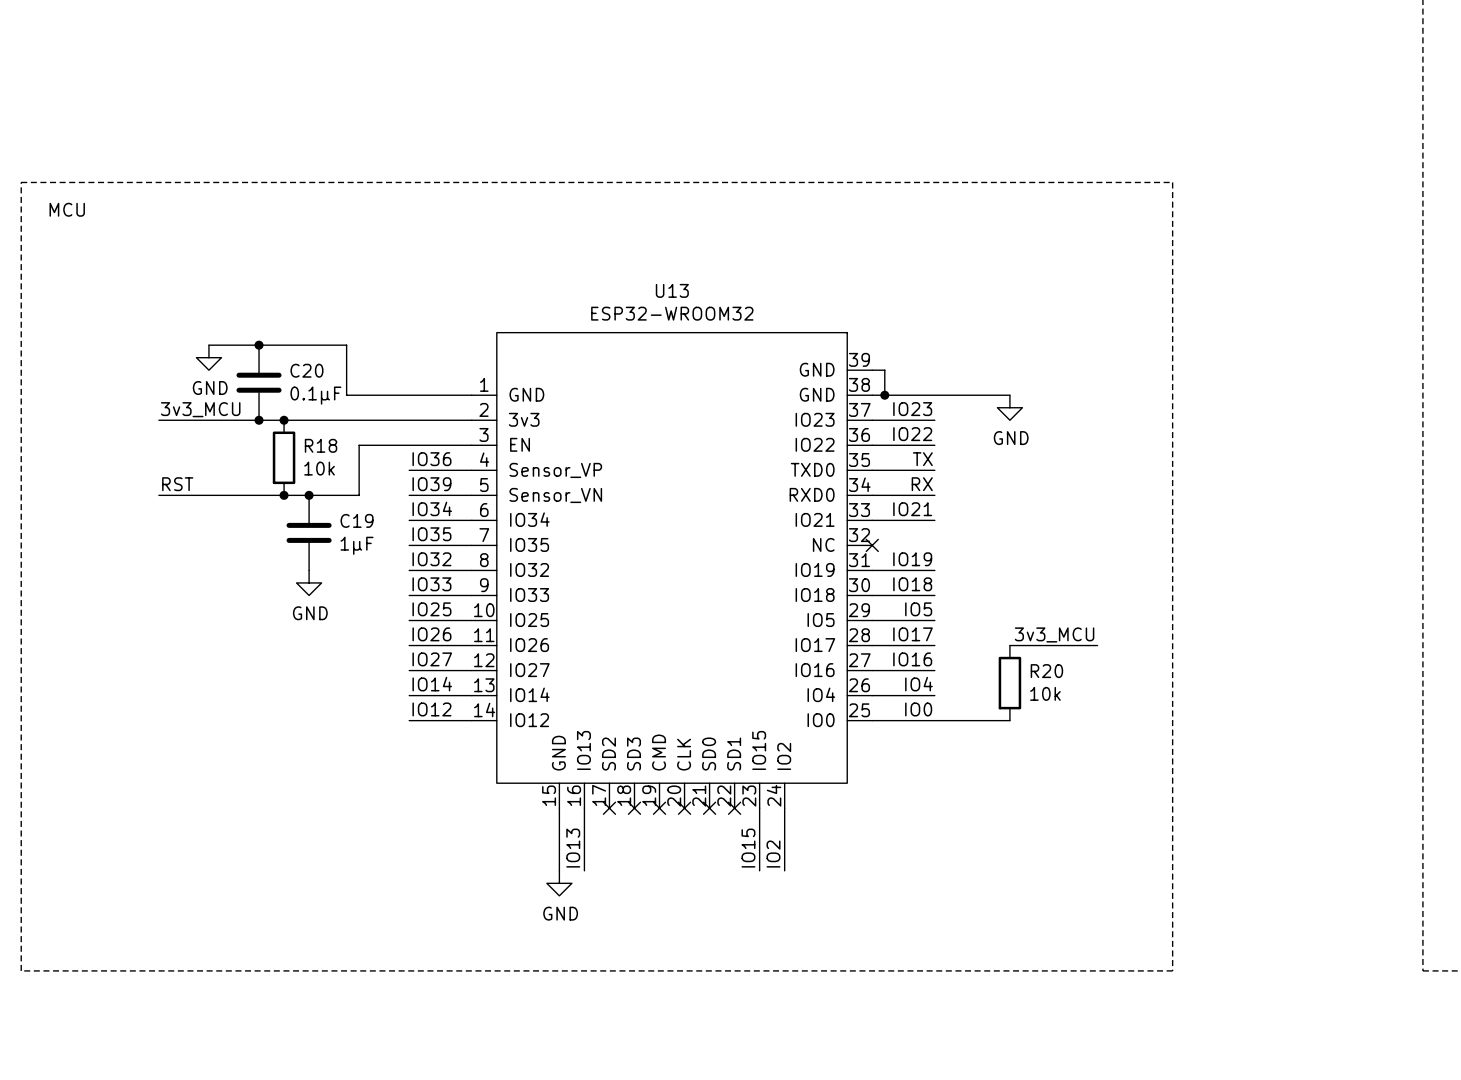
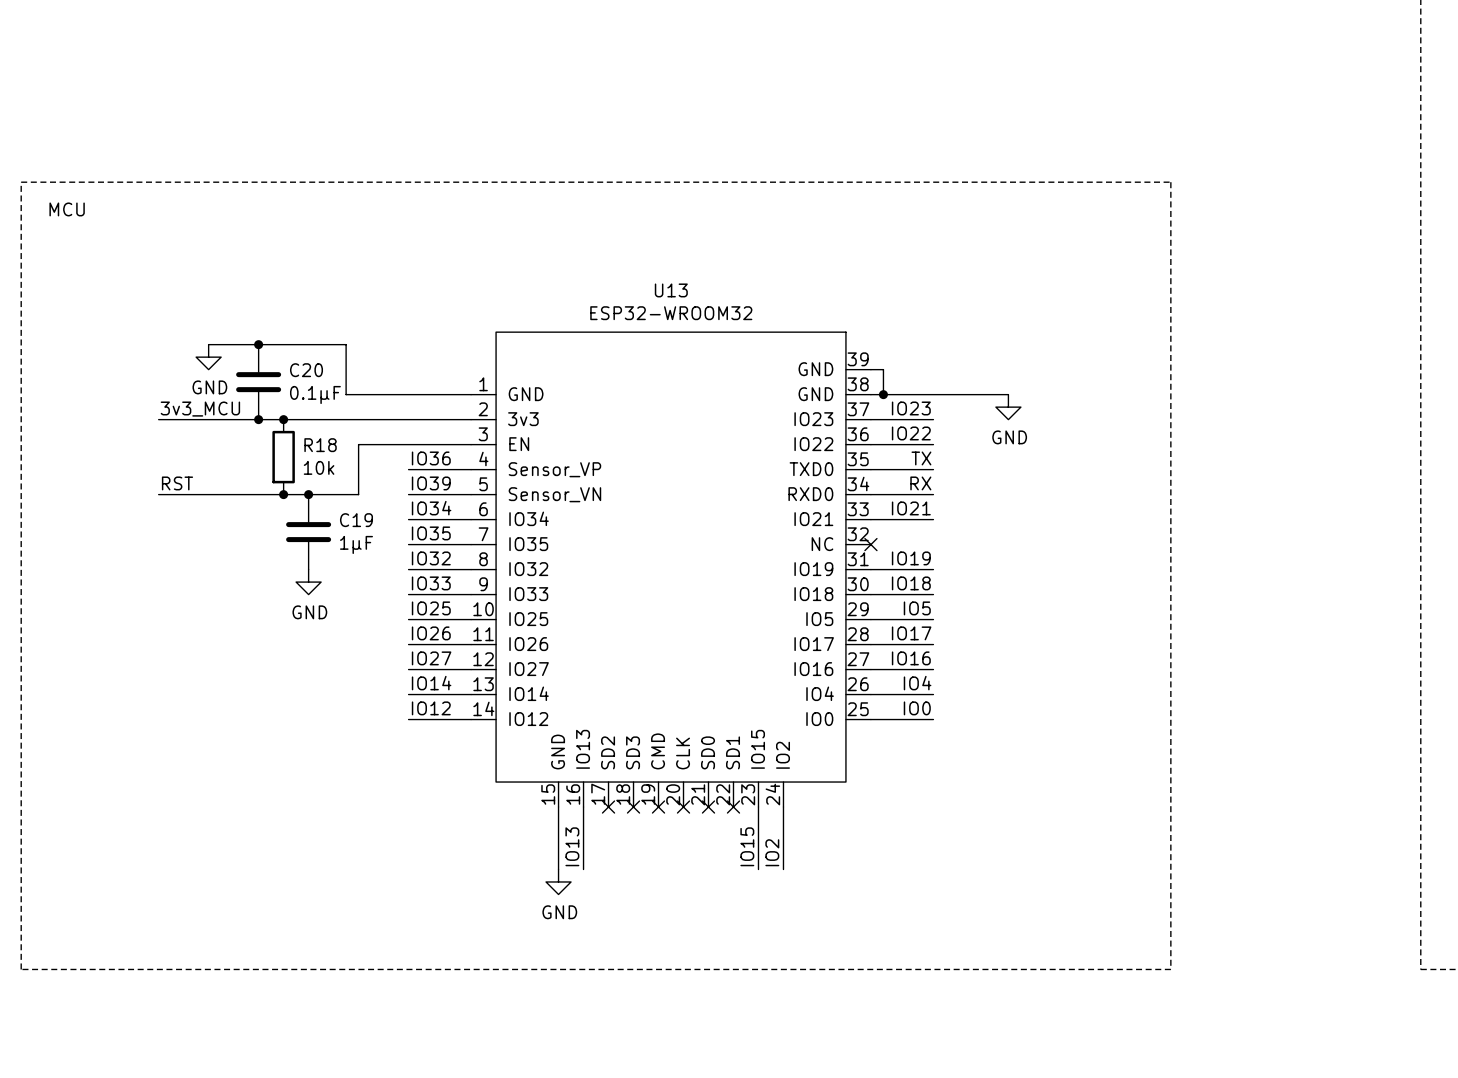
label: 3v3_MCU (1054, 634) -> none
wire: (1009, 645) (1097, 645) -> none
R20: 10k (1009, 683) -> none
wire: (934, 720) (1009, 720) -> none

